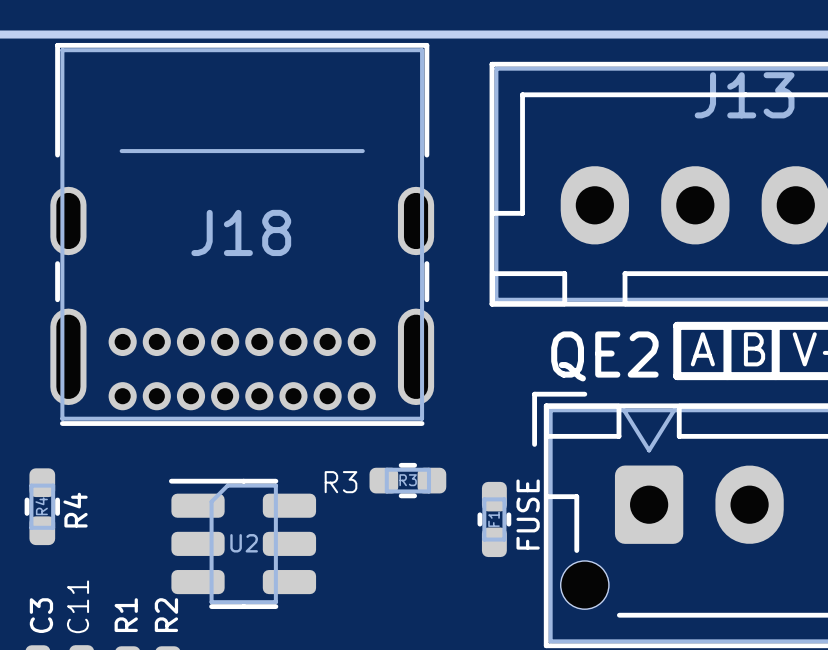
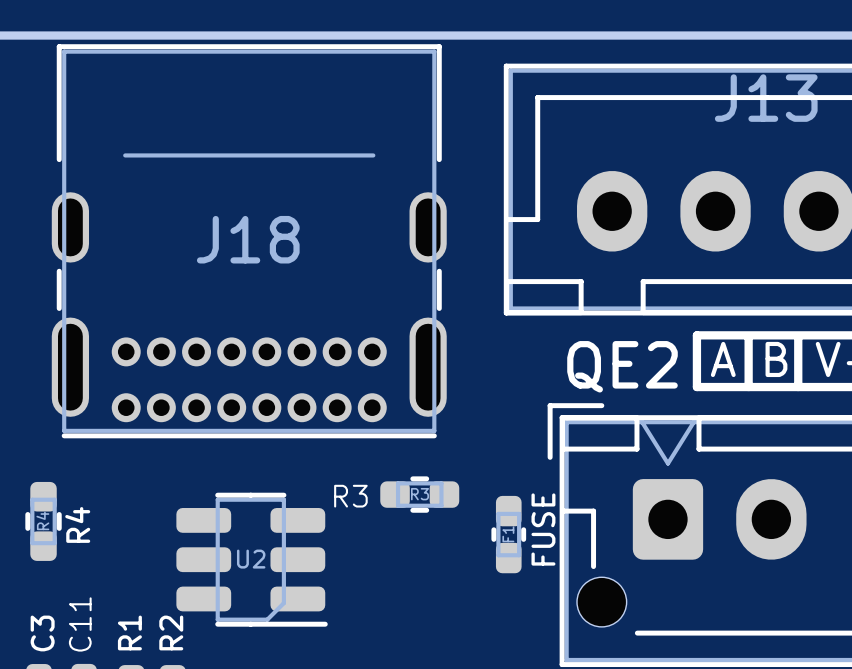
U2 rotation: 0° (242, 543) -> 180° (252, 559)

